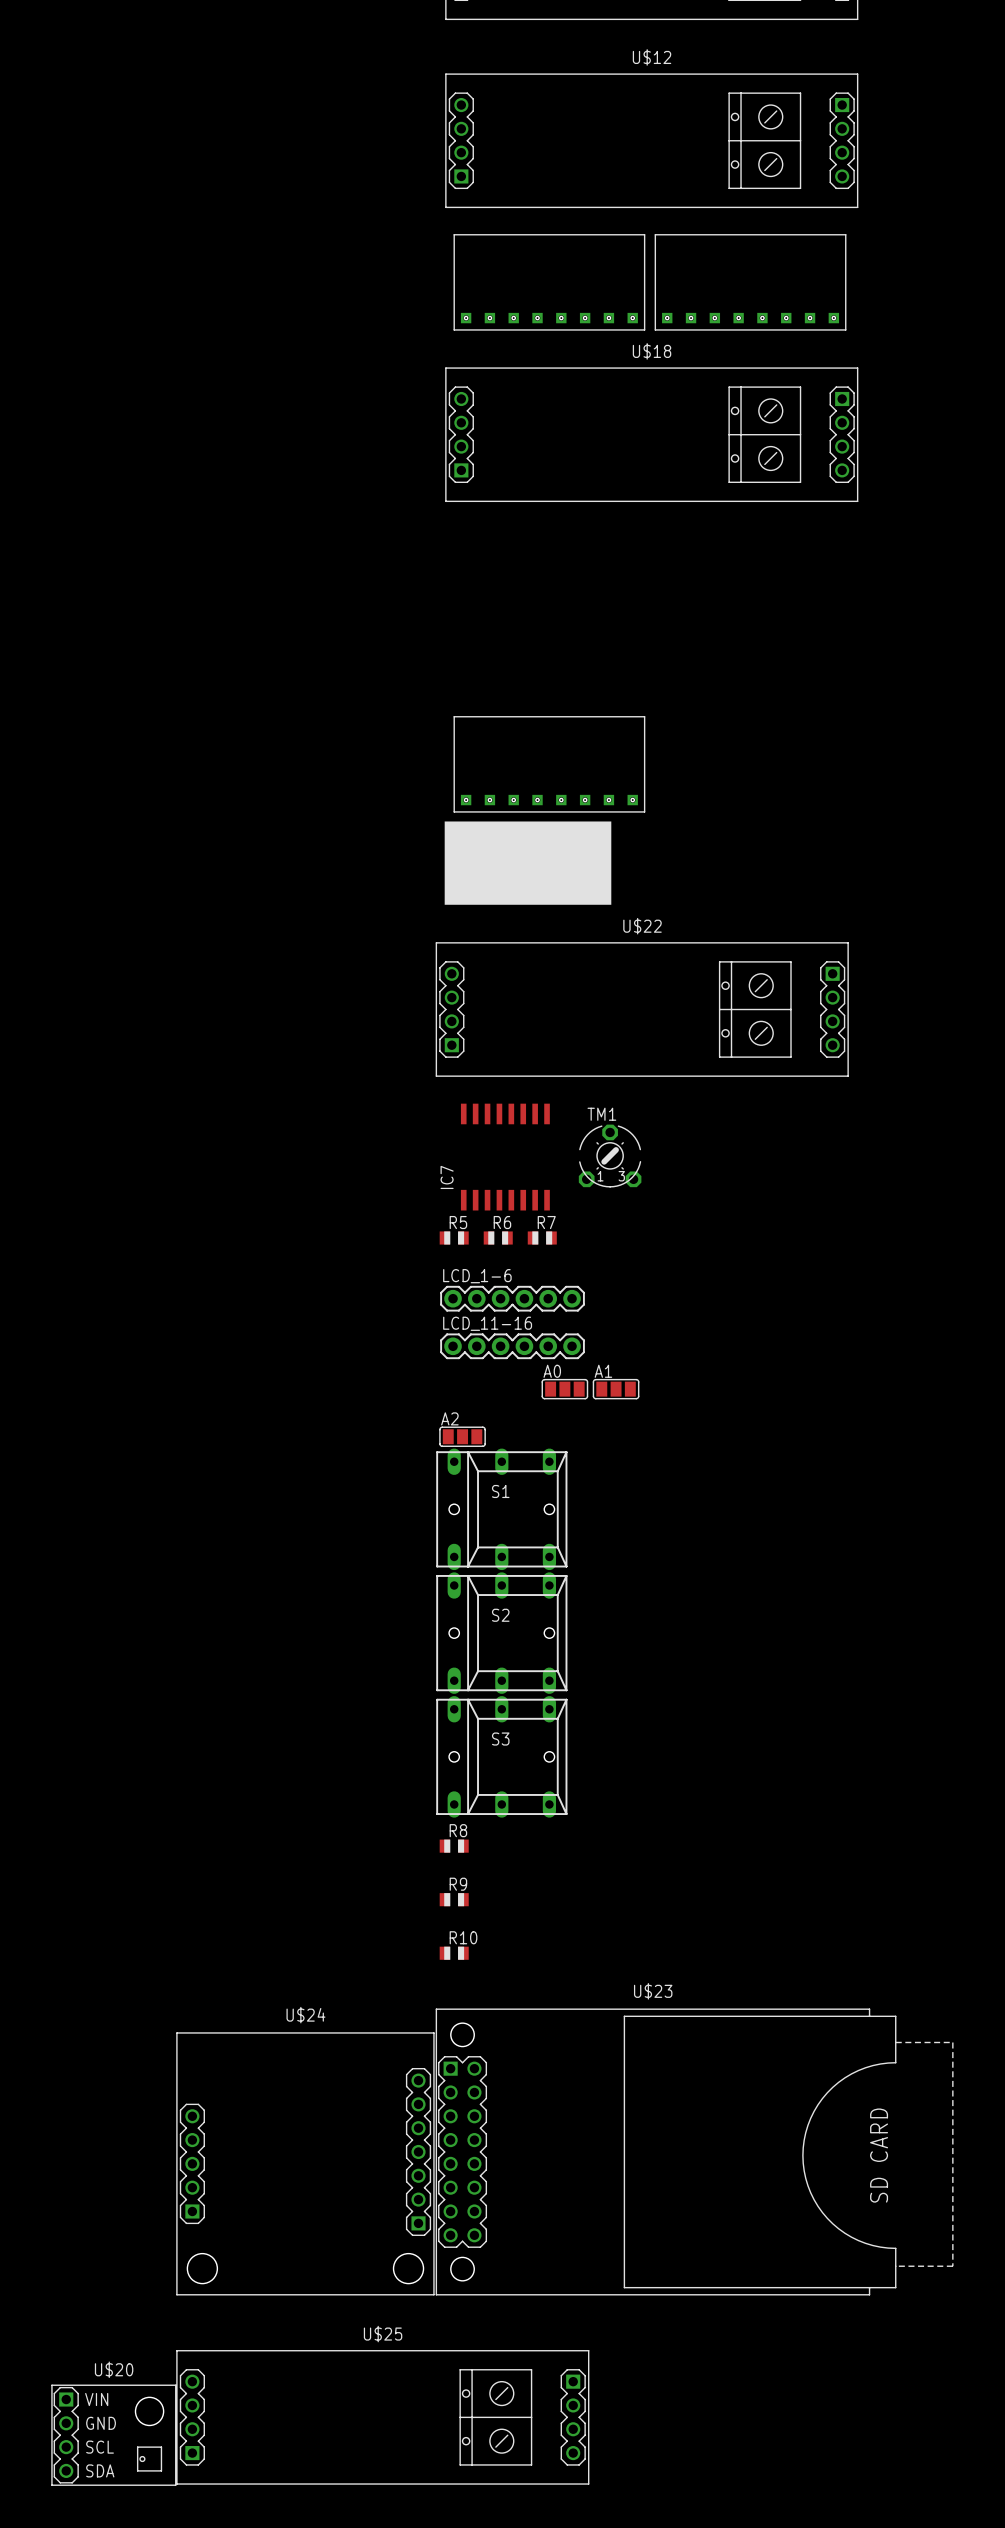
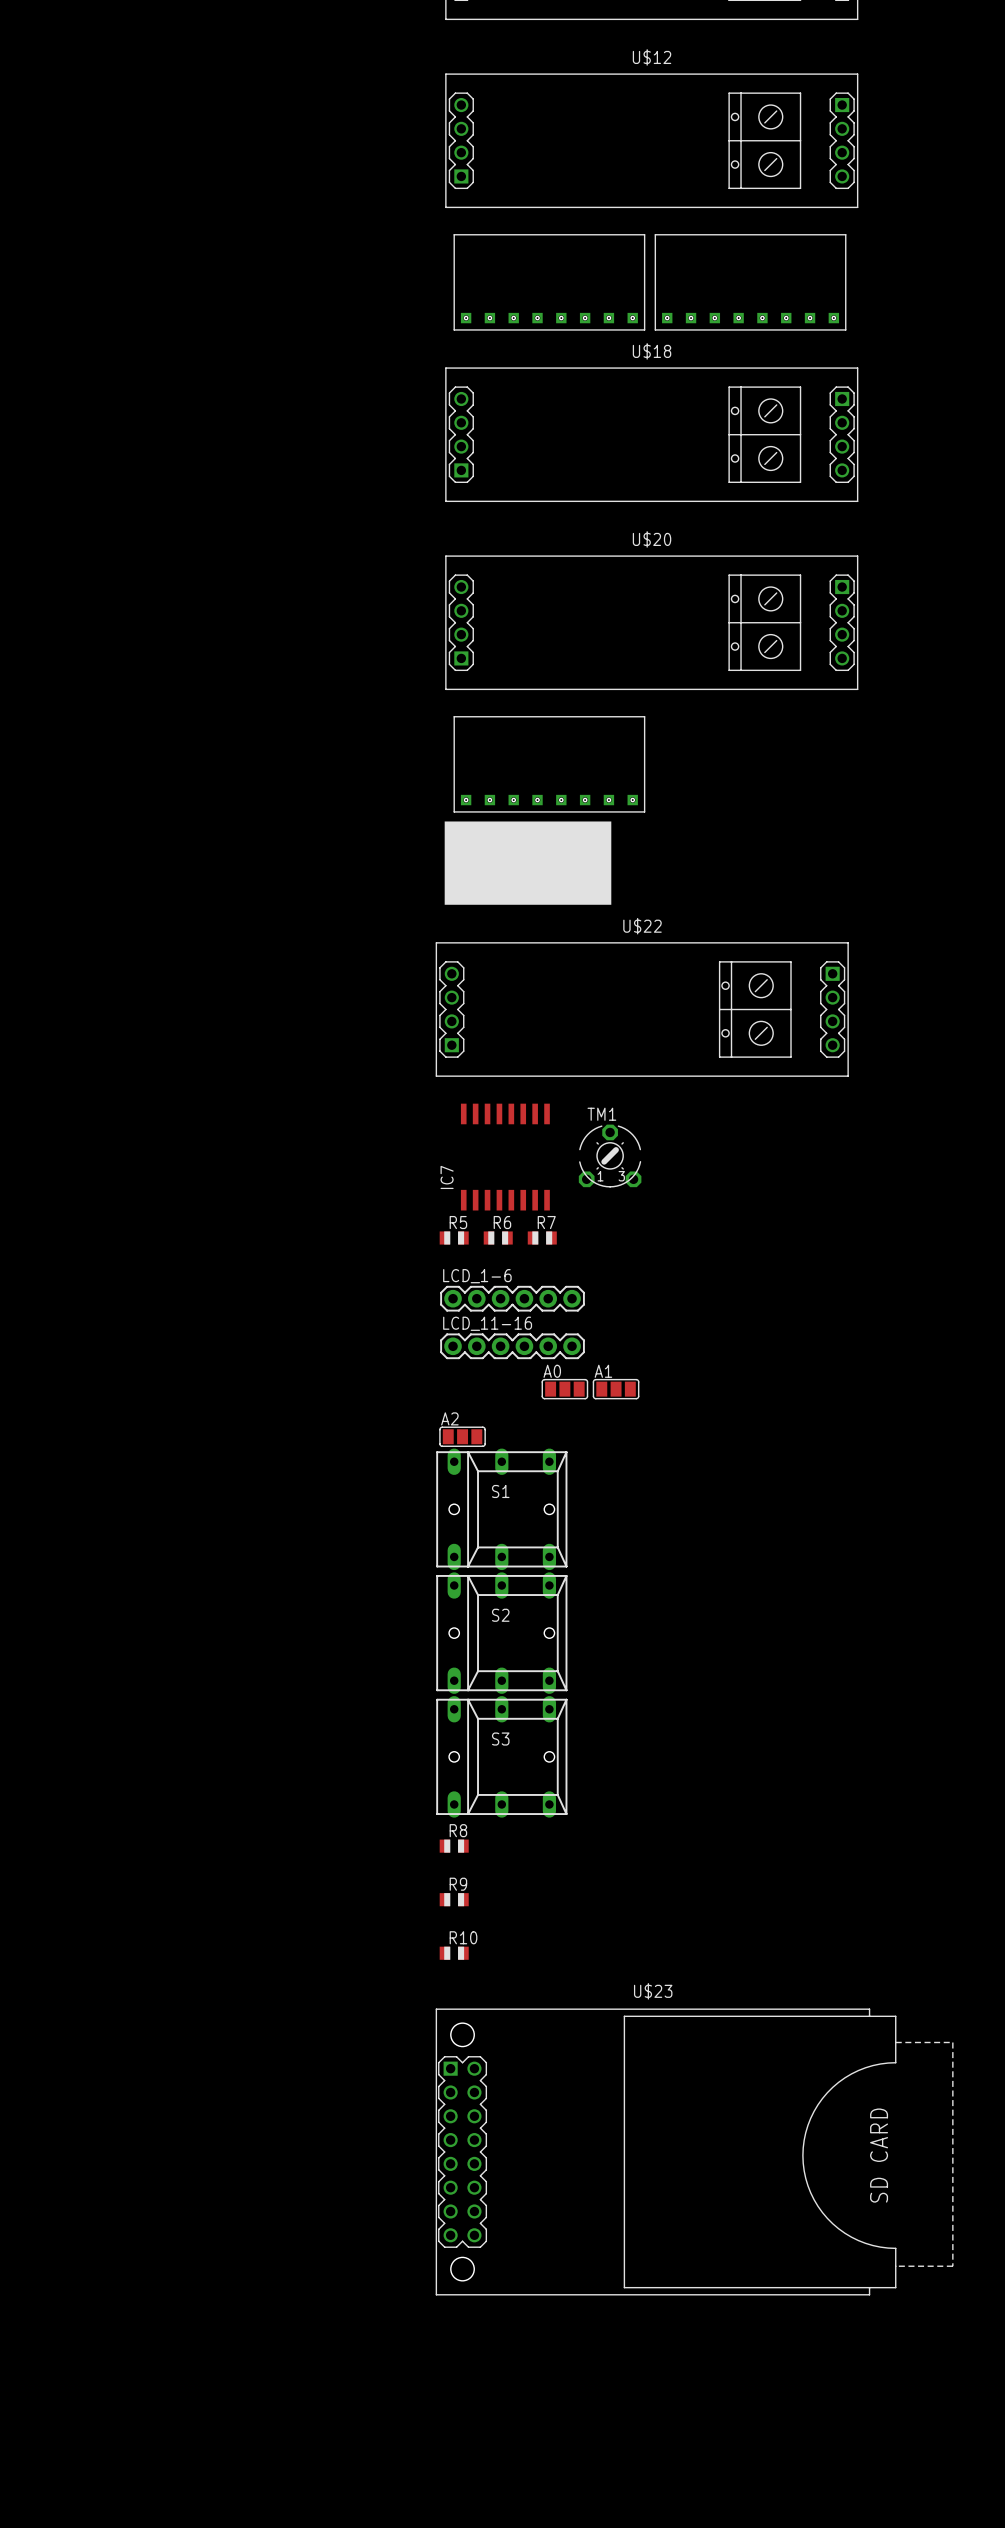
U$24: (305, 2163) -> none
U$20 footprint: [51, 2384, 177, 2486] -> [445, 555, 859, 690]
U$25: (382, 2417) -> none

